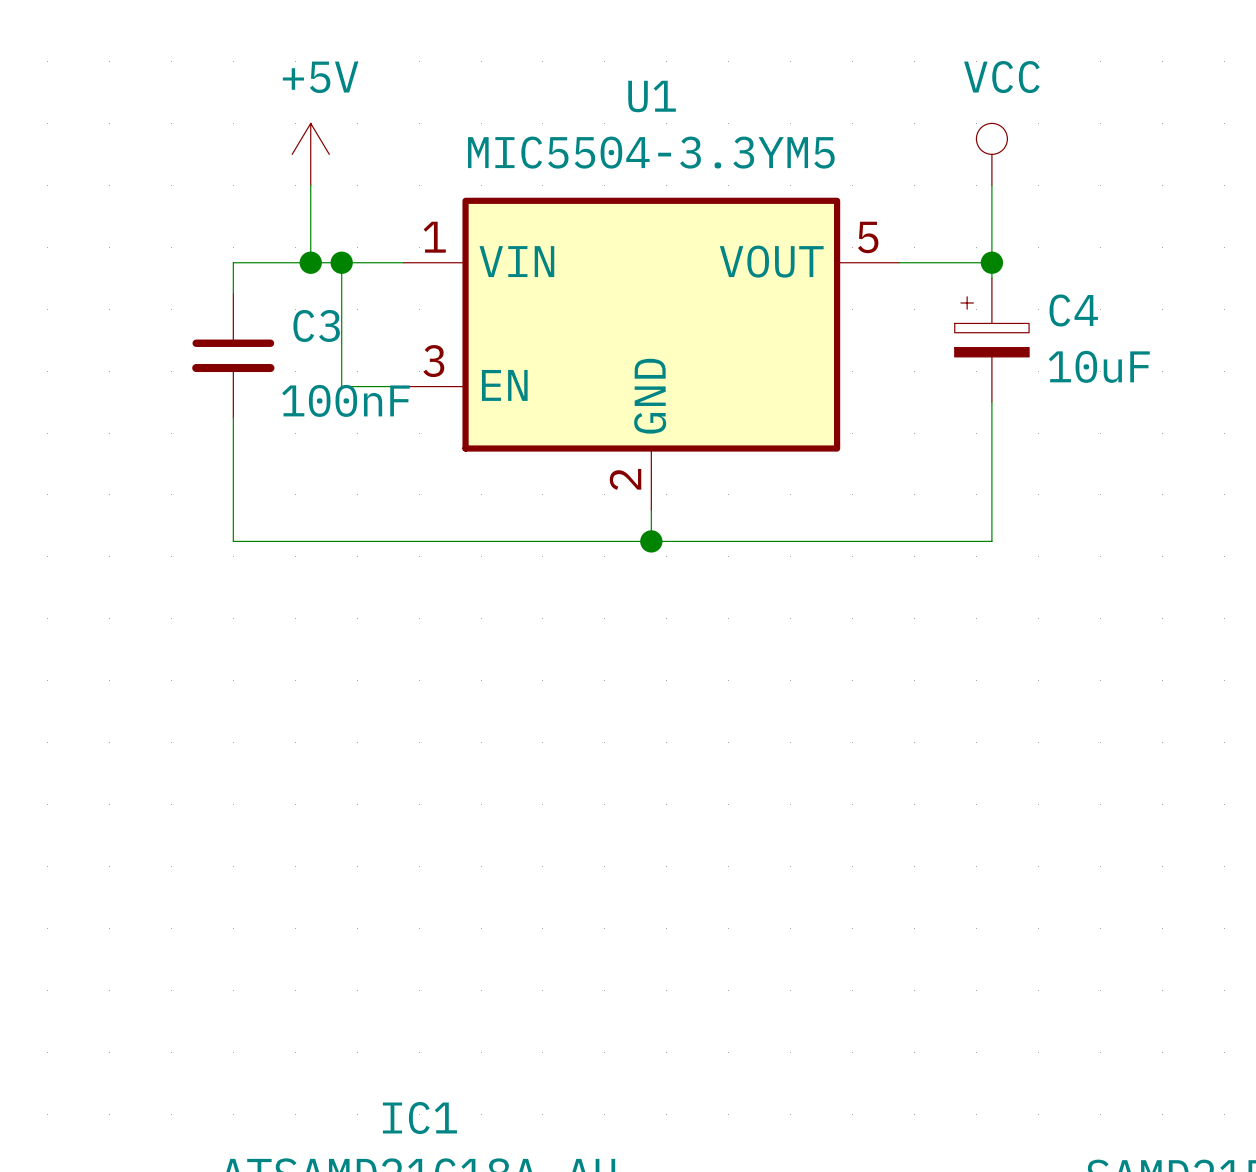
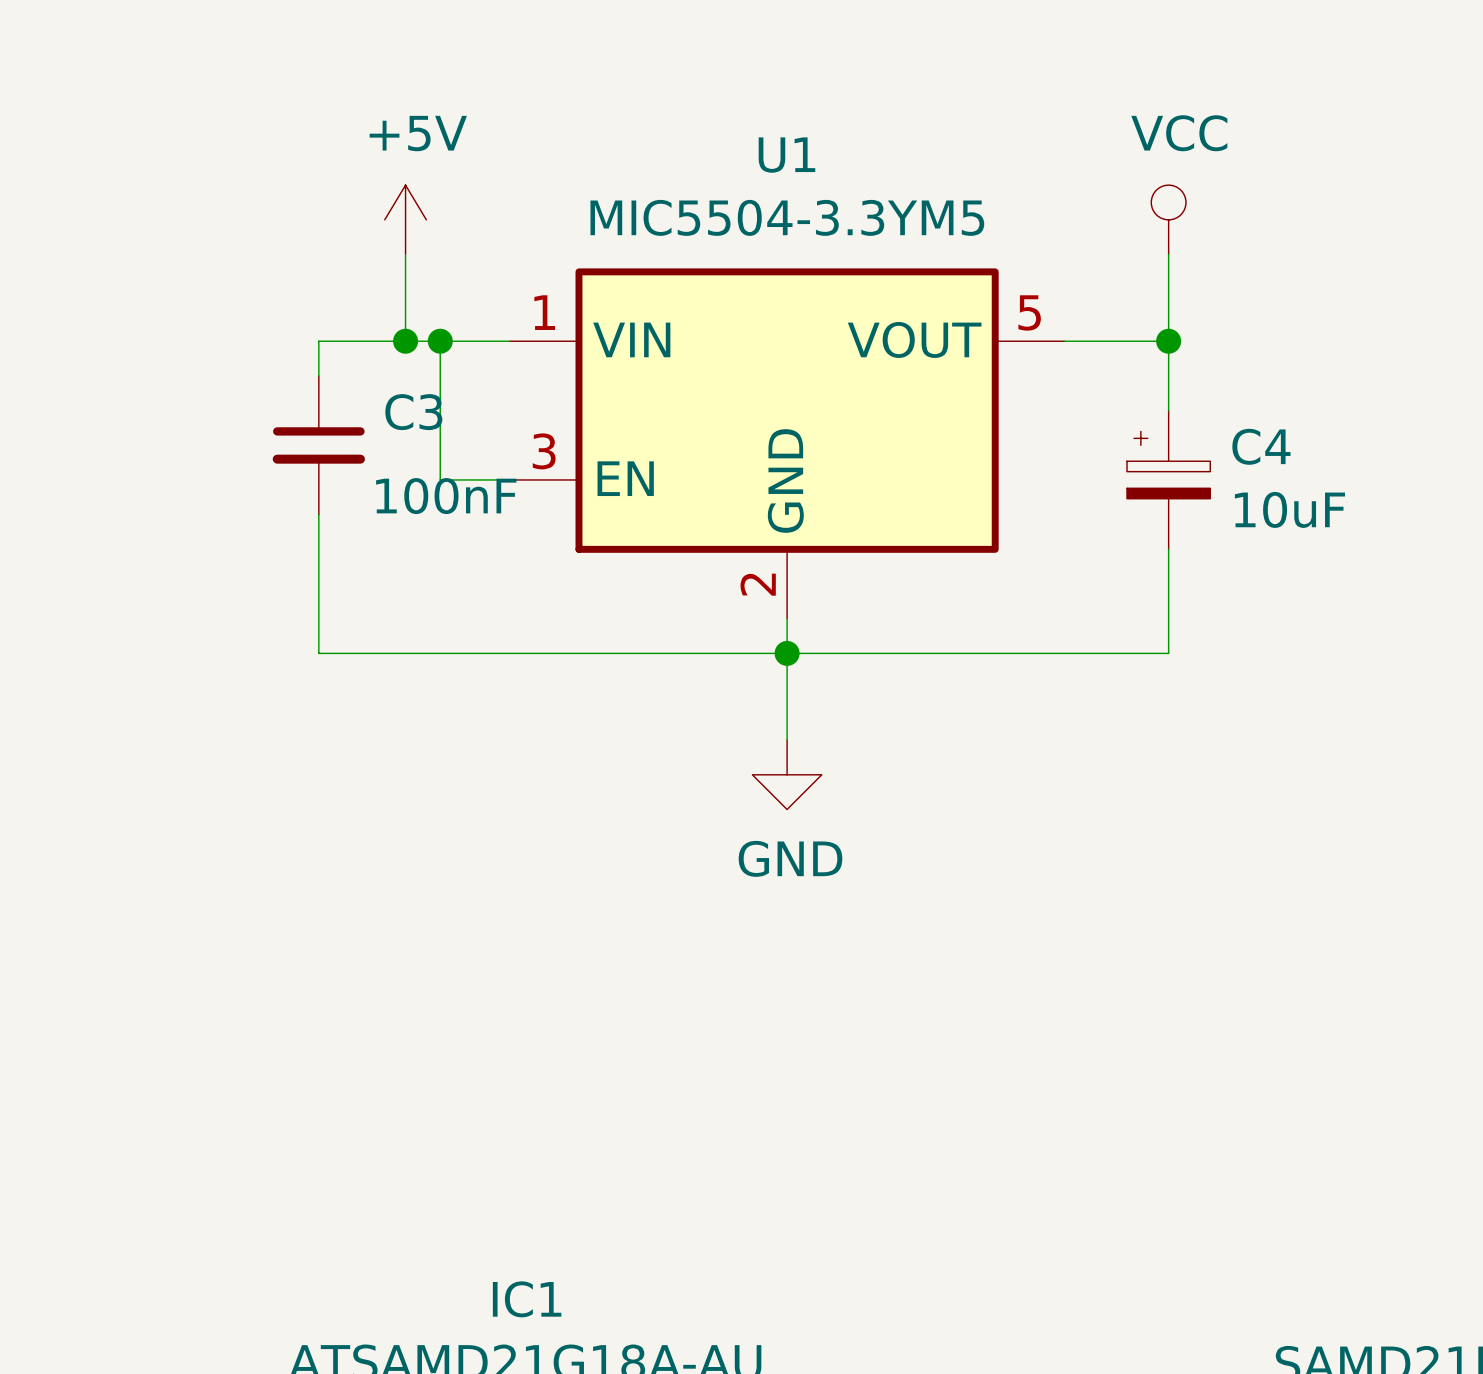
C4 position: (991, 340) -> (1168, 479)
wire: none -> (787, 653) (787, 740)
power symbol: none -> GND (787, 774)

